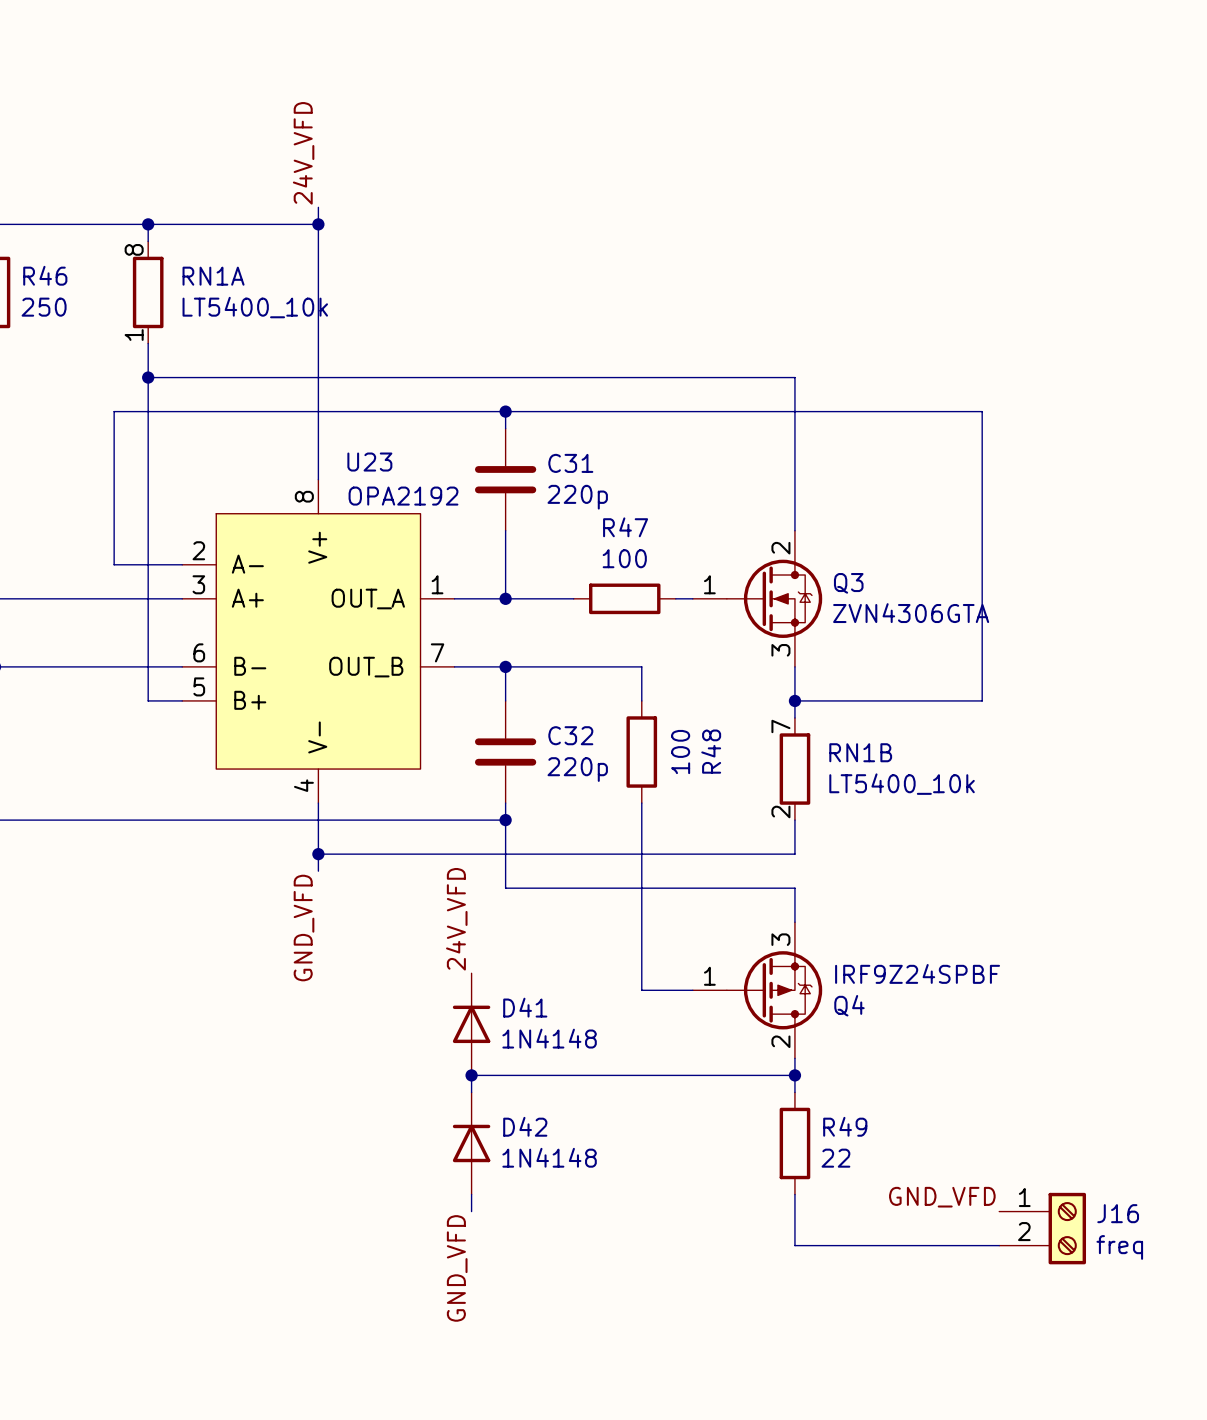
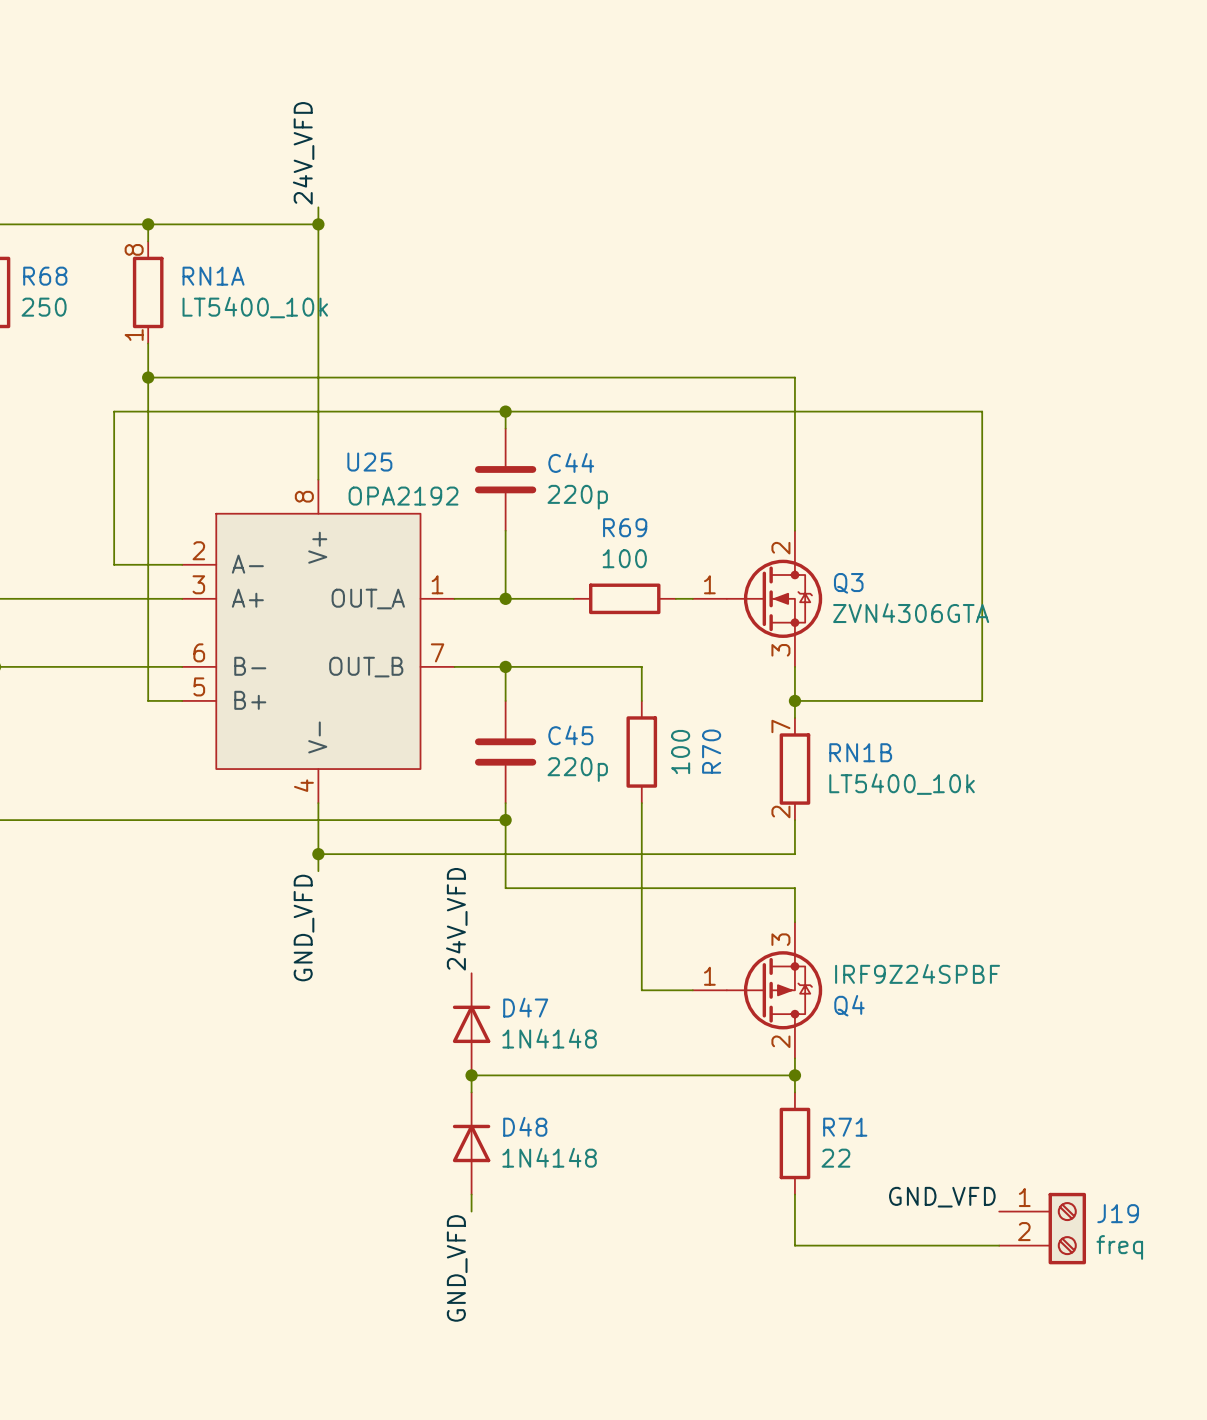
R46 name: R46 (45, 275) -> R68 (45, 276)
U23 name: U23 (369, 462) -> U25 (369, 462)
C31 name: C31 (570, 463) -> C44 (571, 462)
R47 name: R47 (625, 527) -> R69 (625, 527)
C32 name: C32 (570, 735) -> C45 (570, 735)
R48 name: R48 (711, 751) -> R70 (711, 751)
D41 name: D41 (525, 1007) -> D47 (525, 1007)
D42 name: D42 (525, 1126) -> D48 (525, 1126)
R49 name: R49 (845, 1126) -> R71 (845, 1127)
J16 name: J16 (1118, 1213) -> J19 (1118, 1213)

